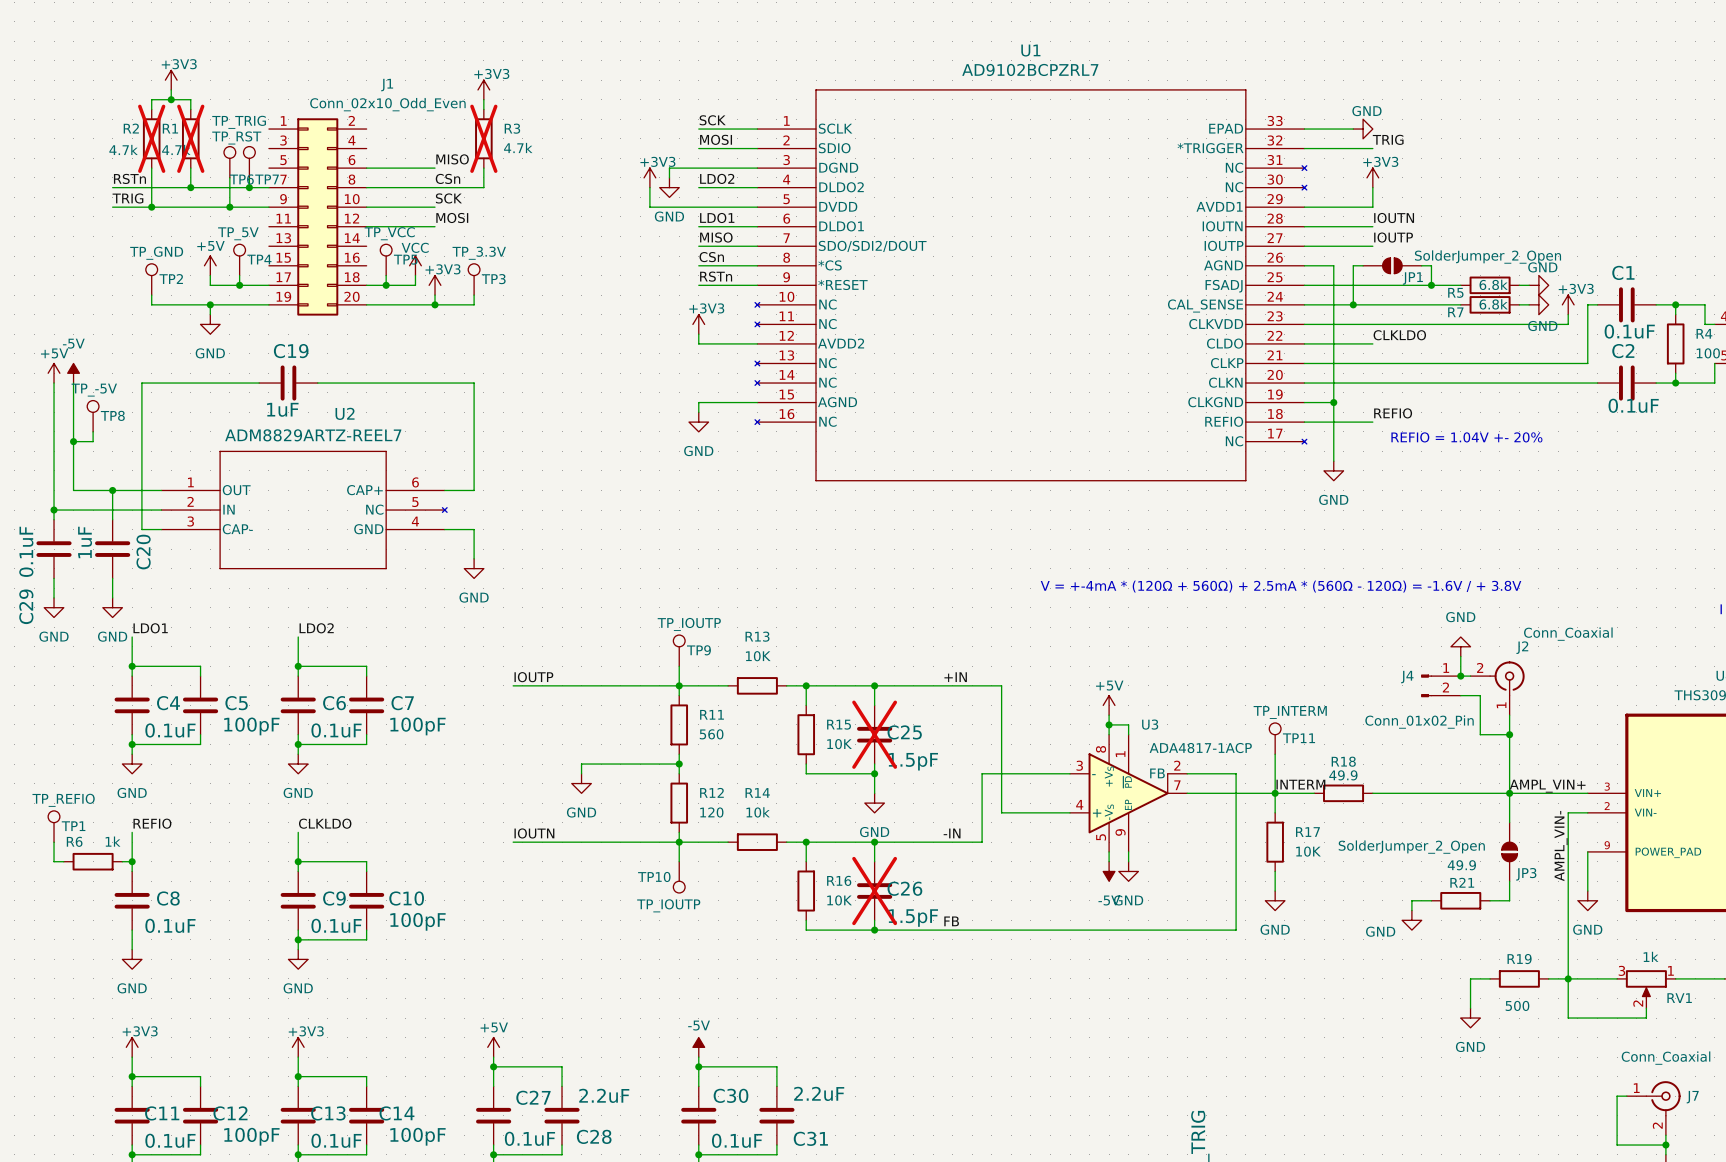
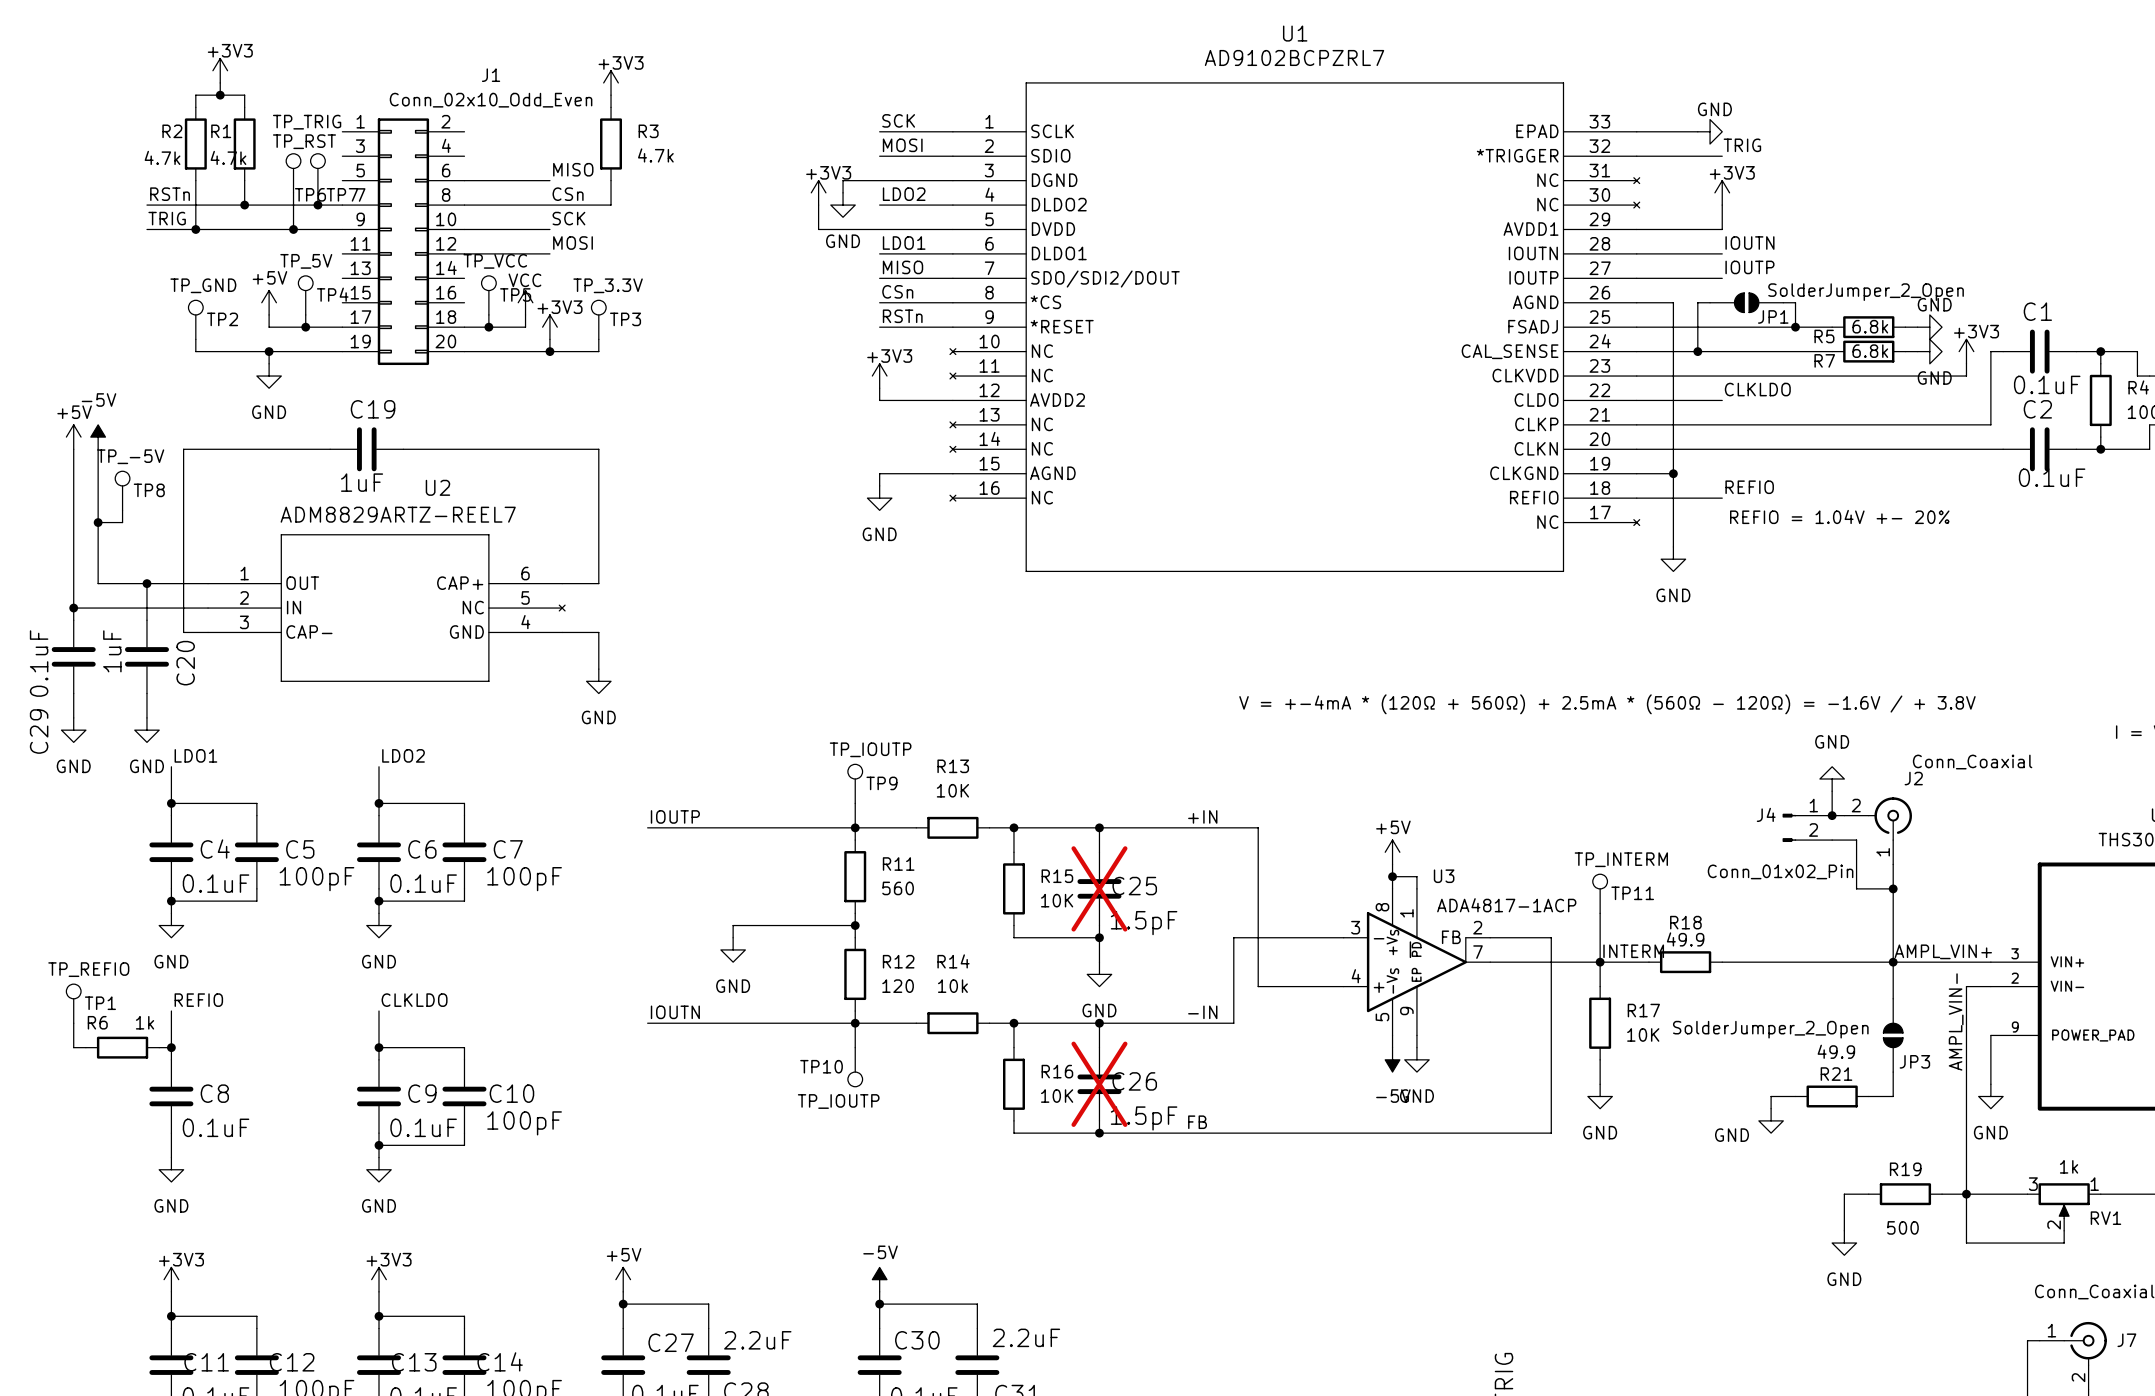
R2 do-not-place cross: (151, 138) -> none
R1 do-not-place cross: (190, 138) -> none
R3 do-not-place cross: (483, 138) -> none

